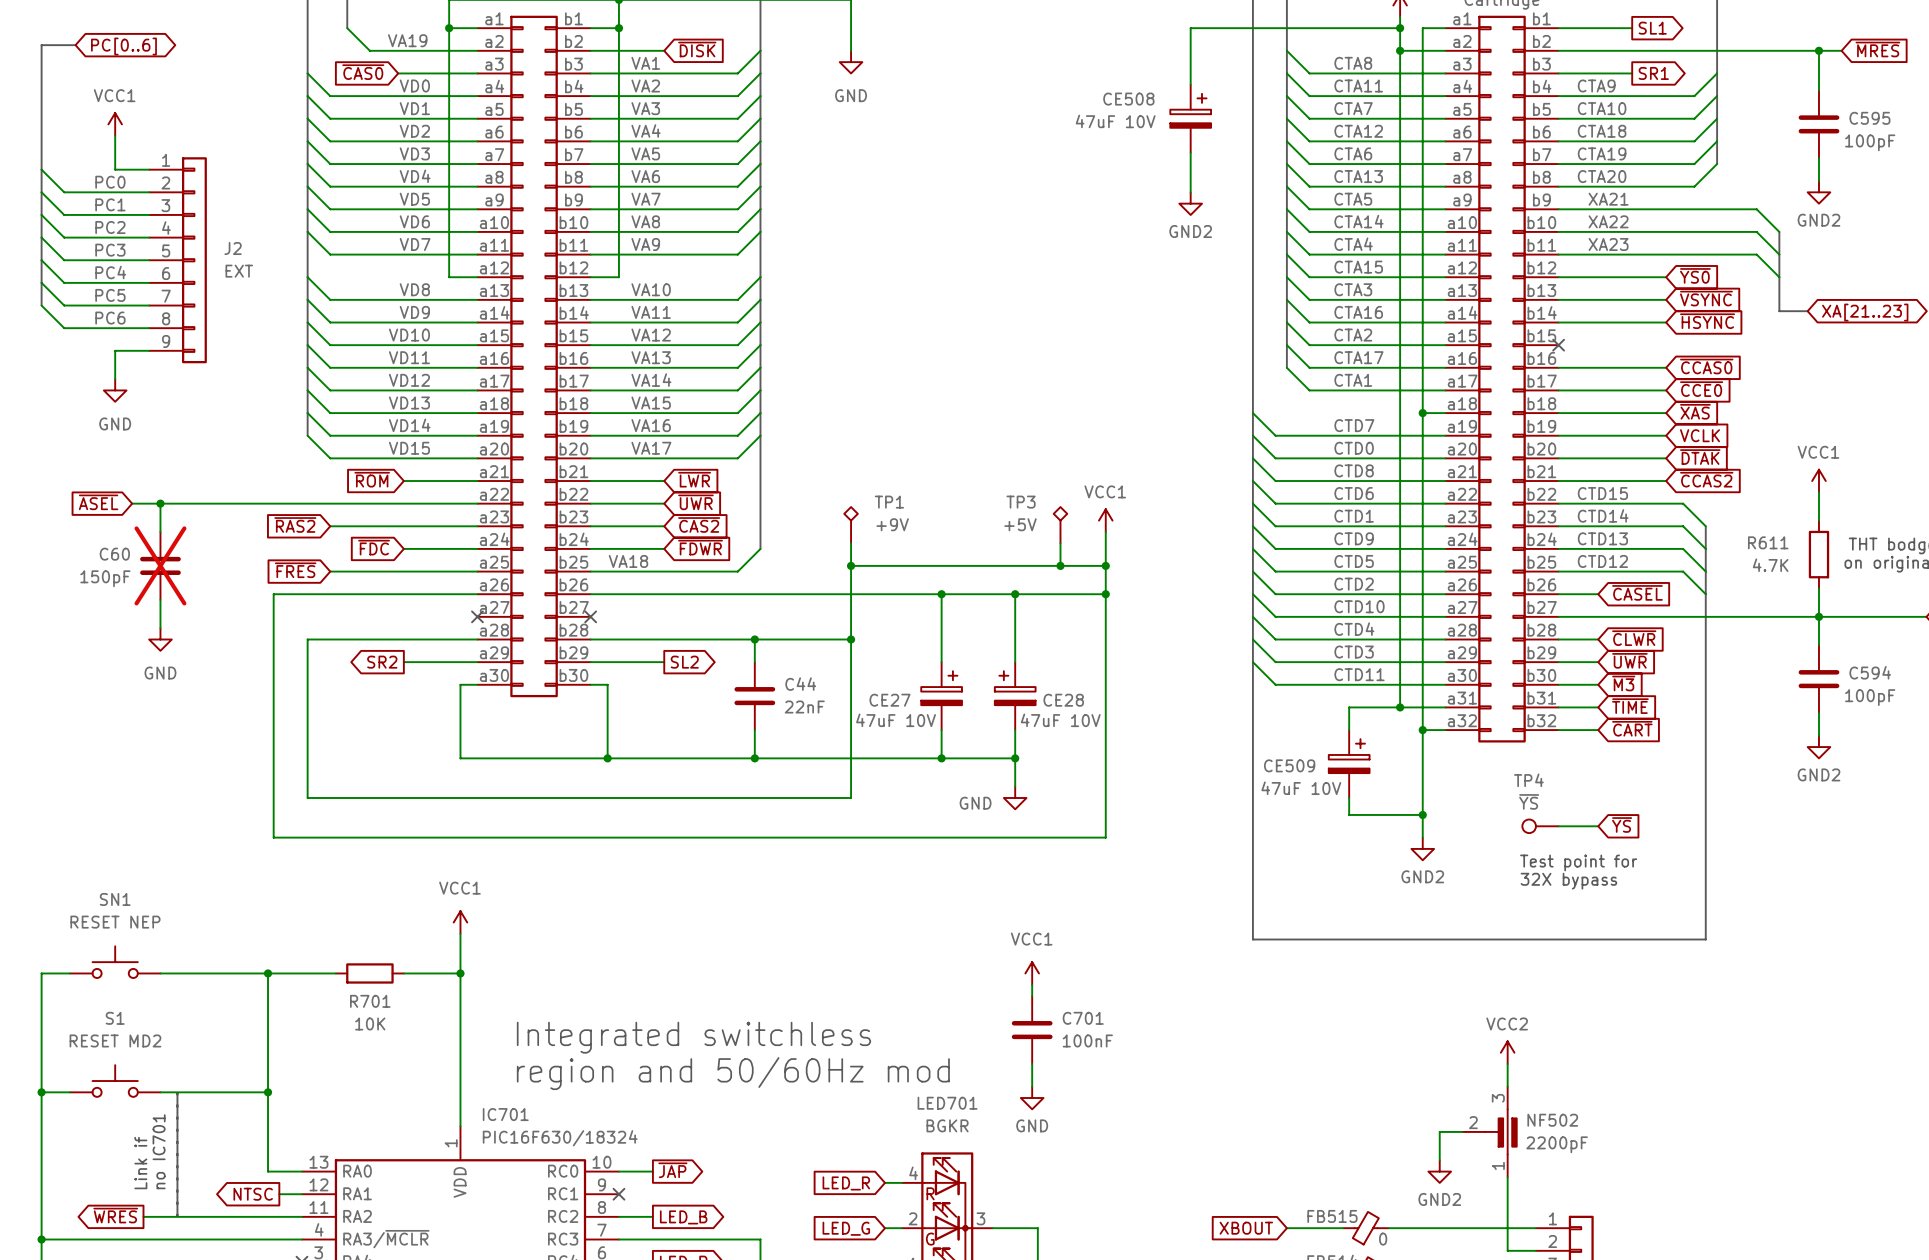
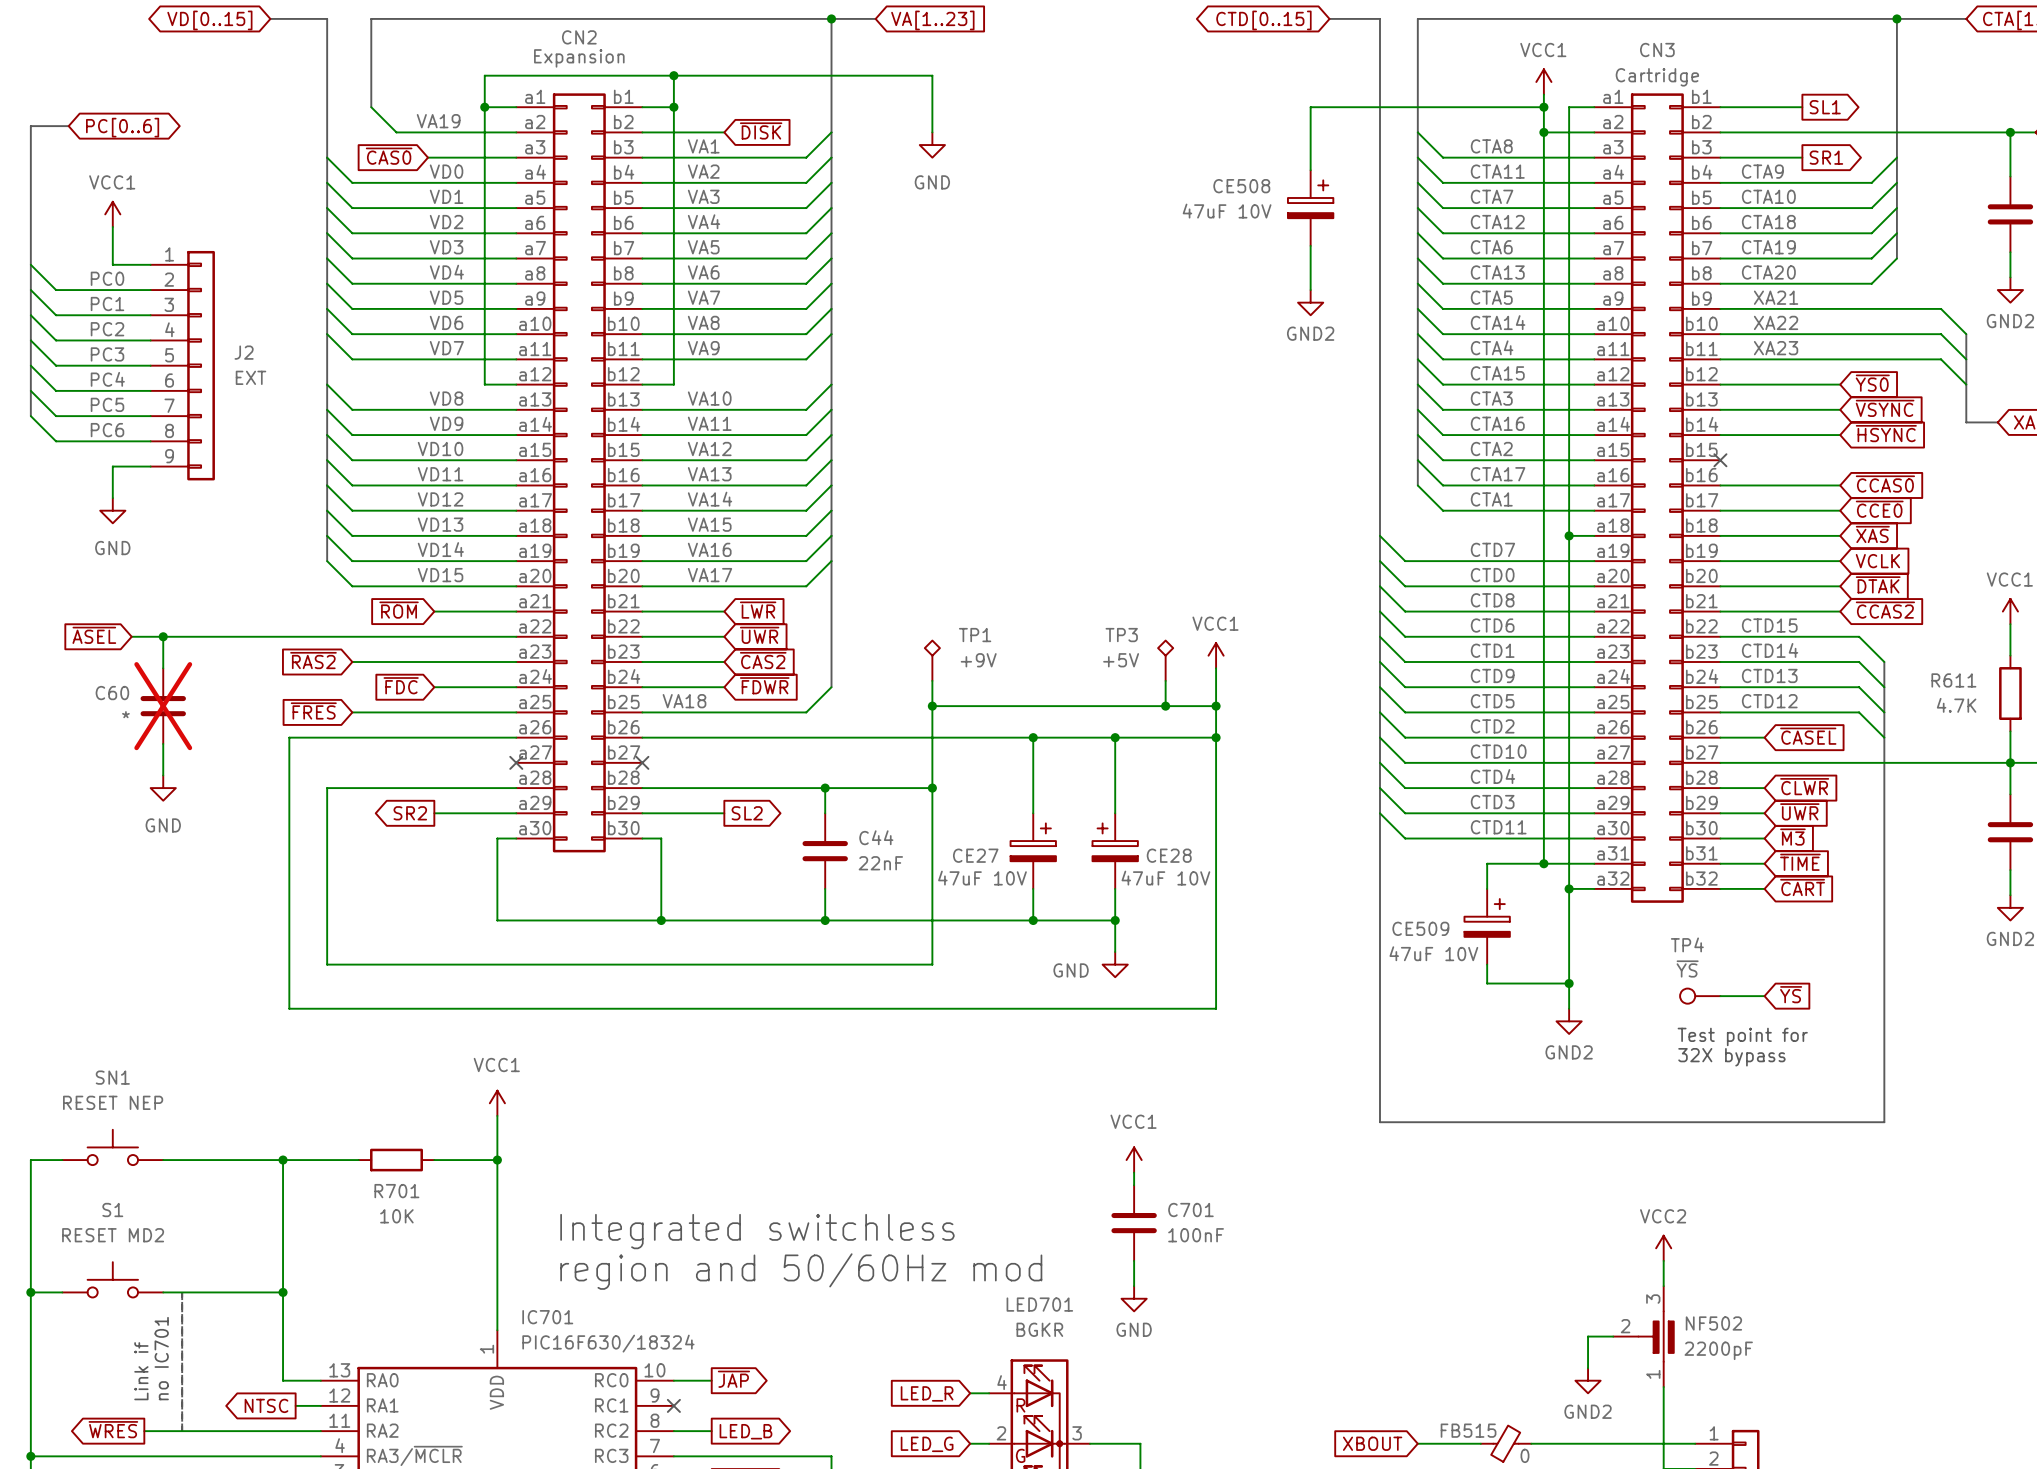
C60 value: 150pF (105, 578) -> * (125, 714)

